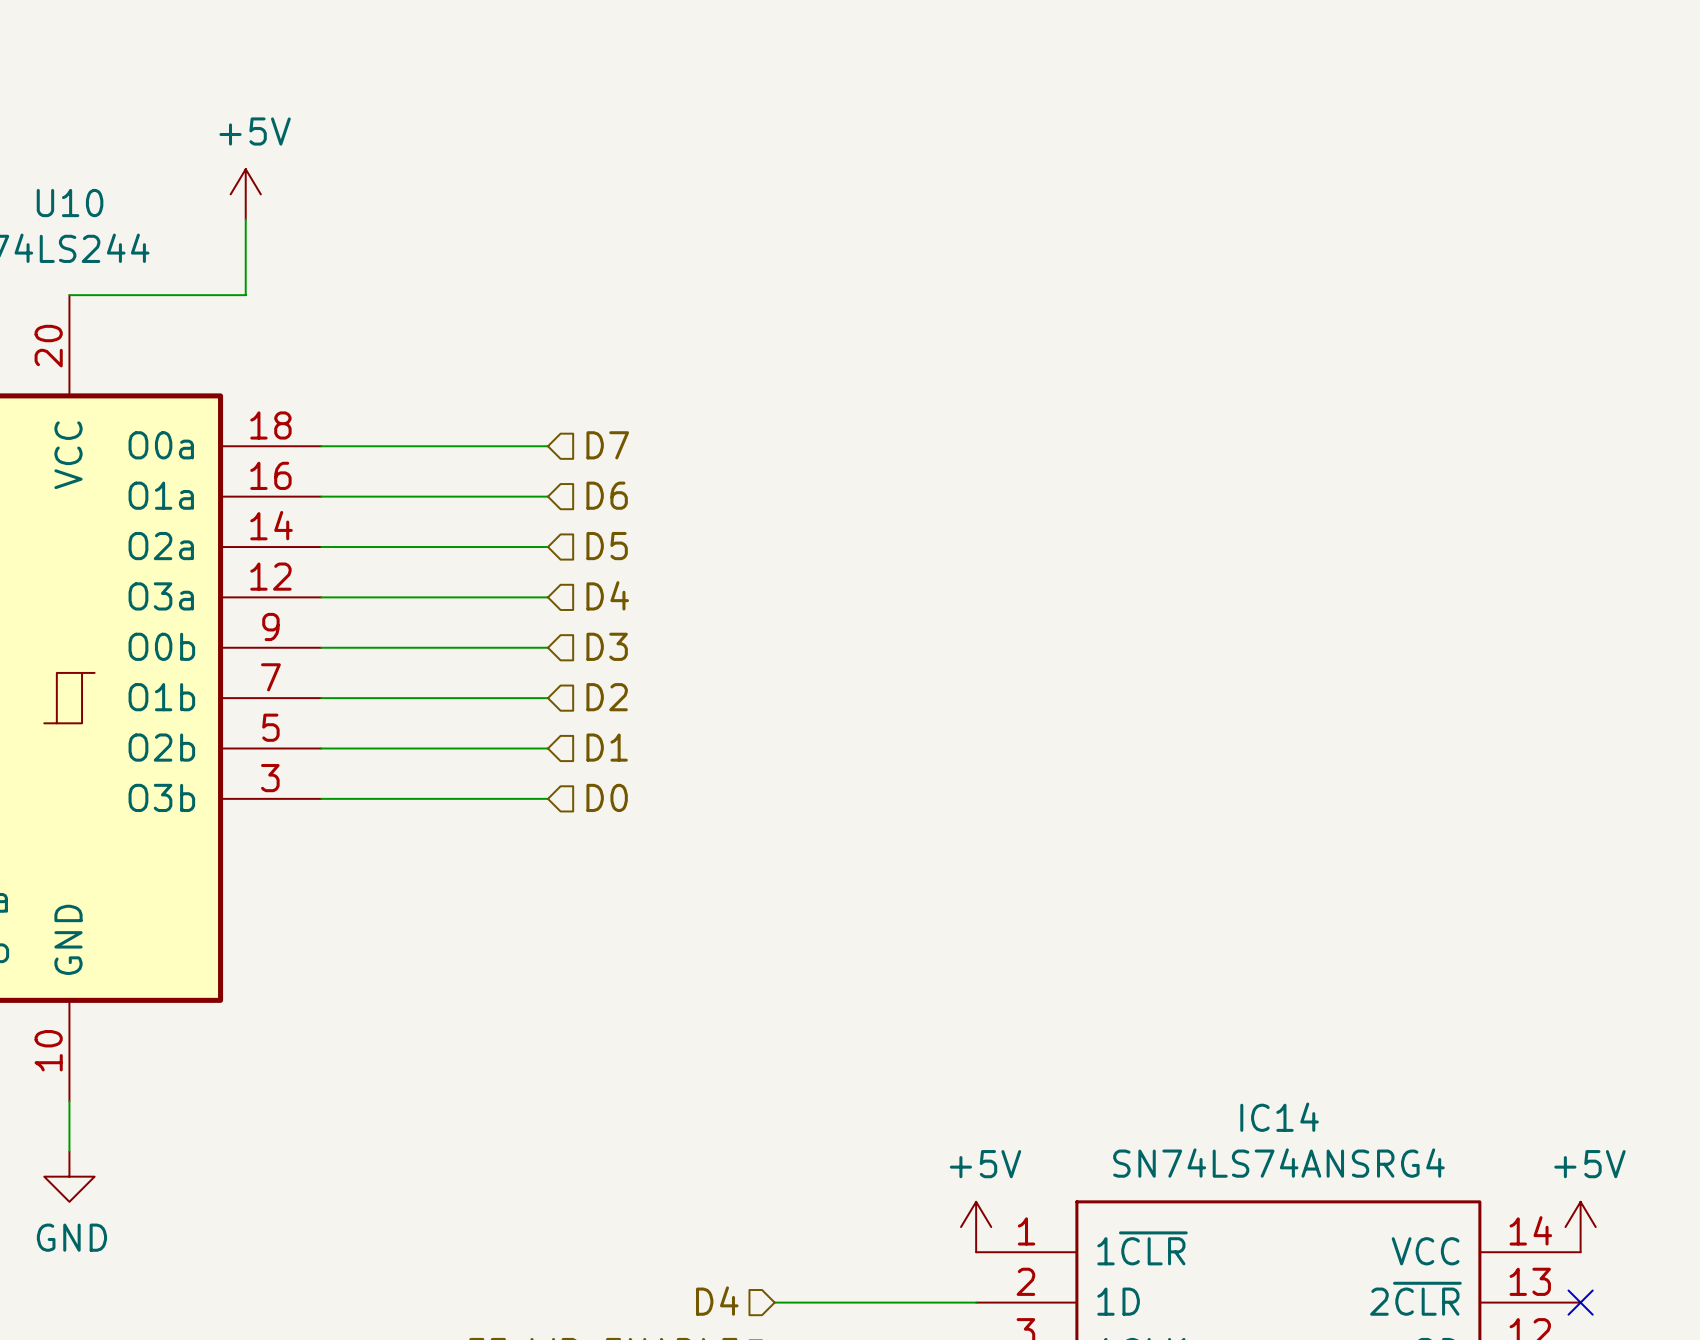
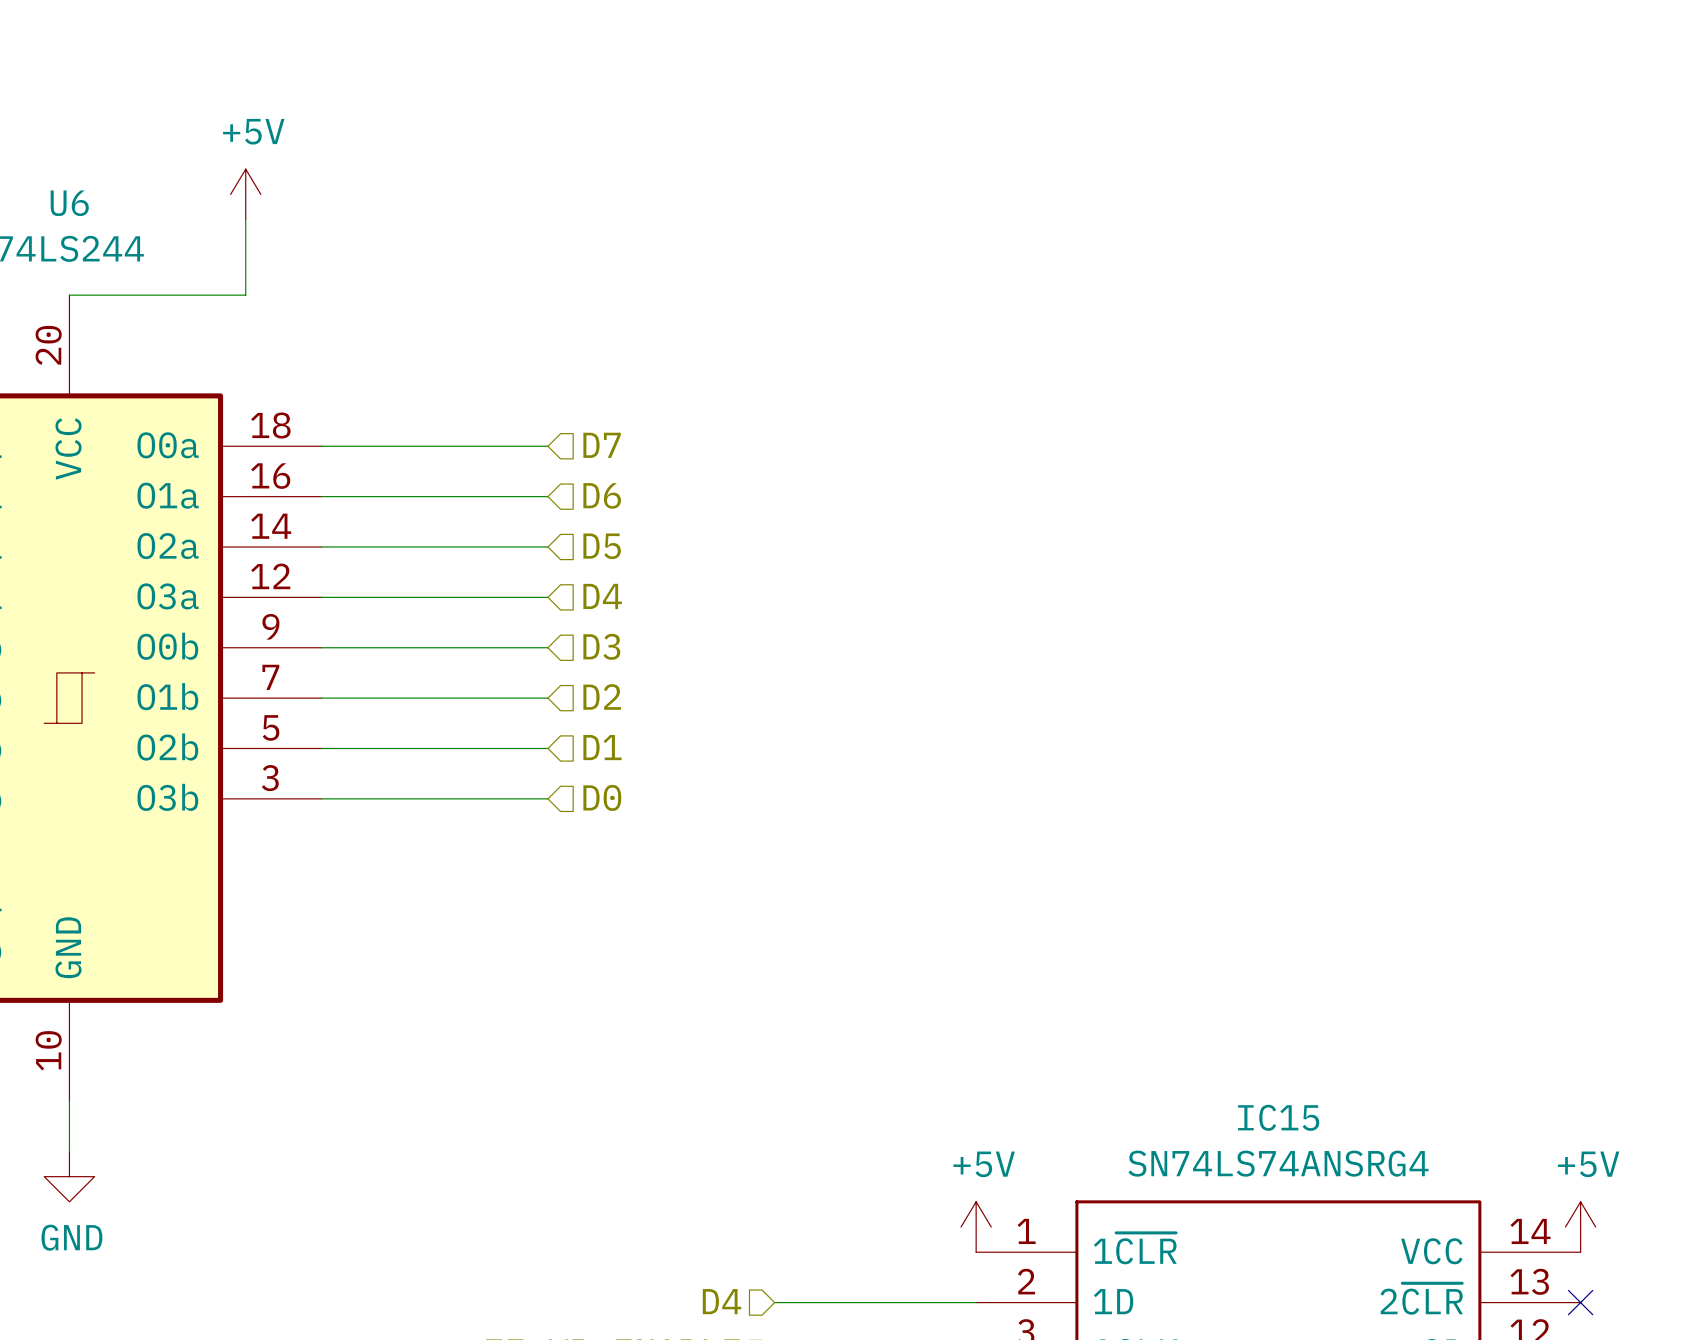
U10 name: U10 (70, 203) -> U6 (69, 203)
IC14 name: IC14 (1279, 1117) -> IC15 (1278, 1117)

